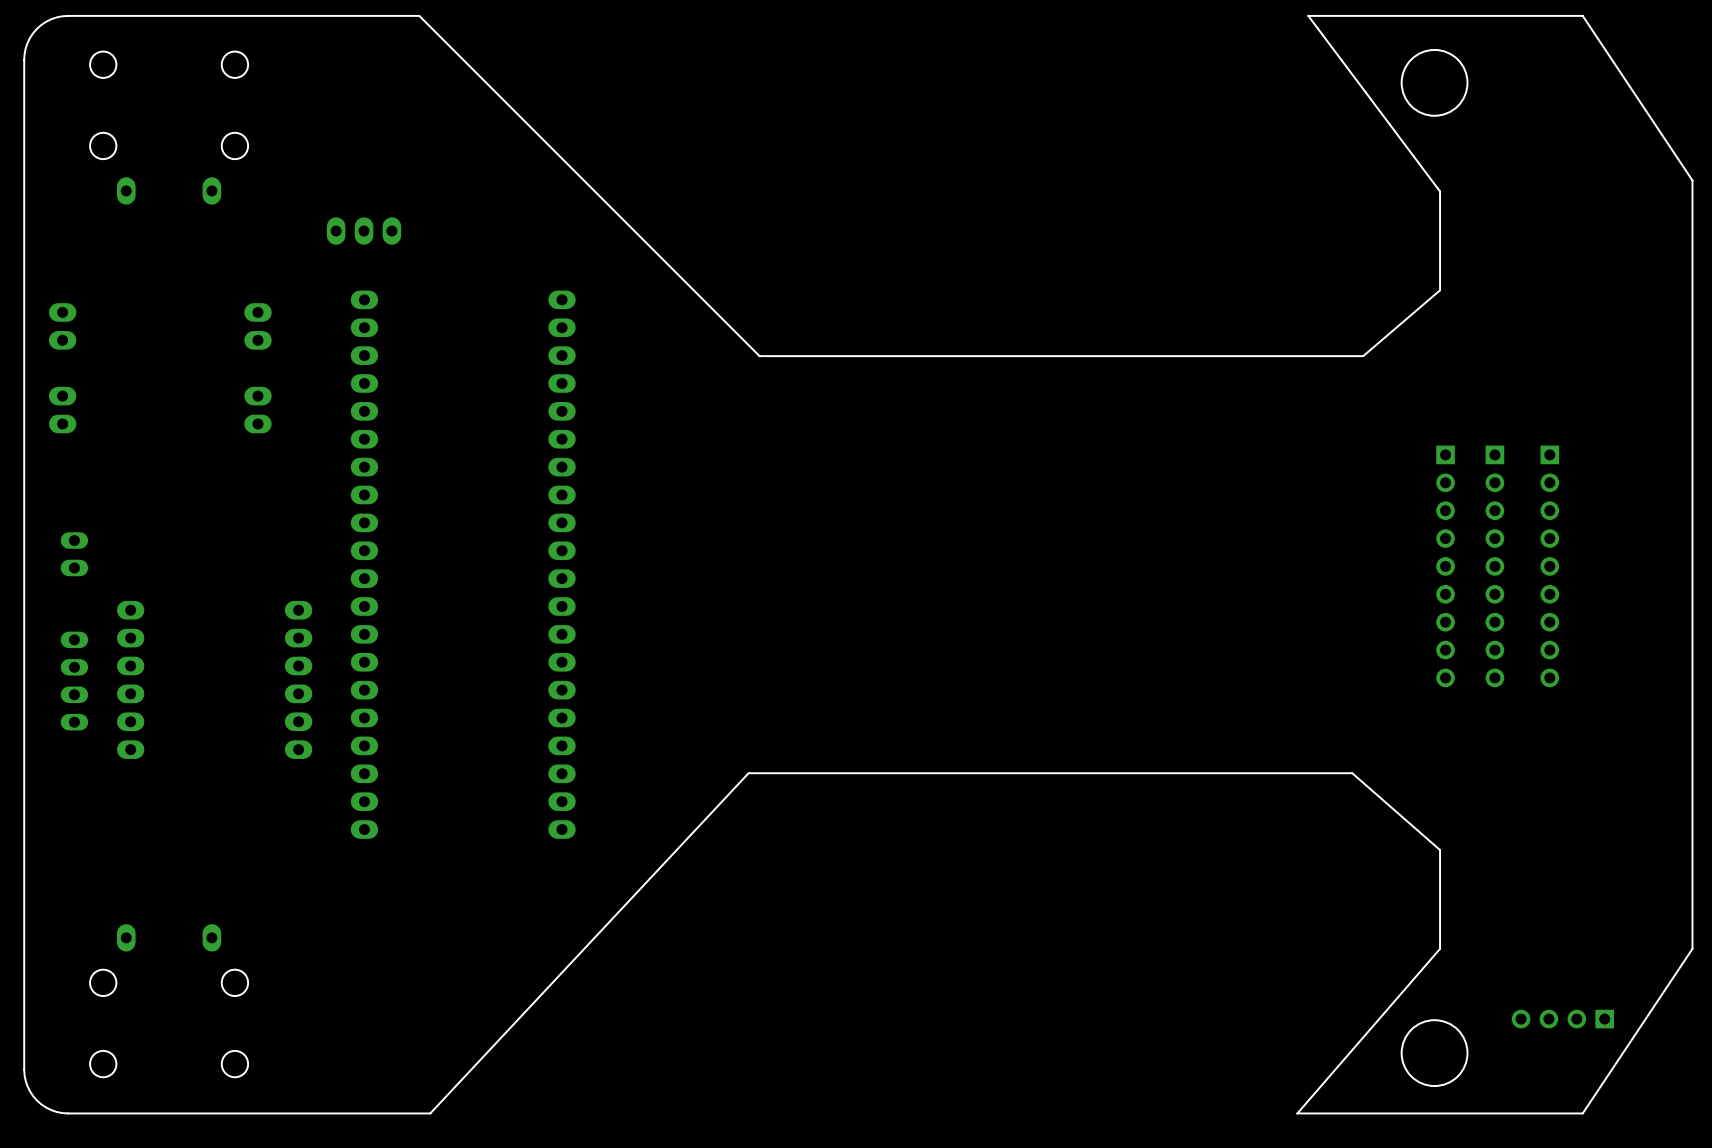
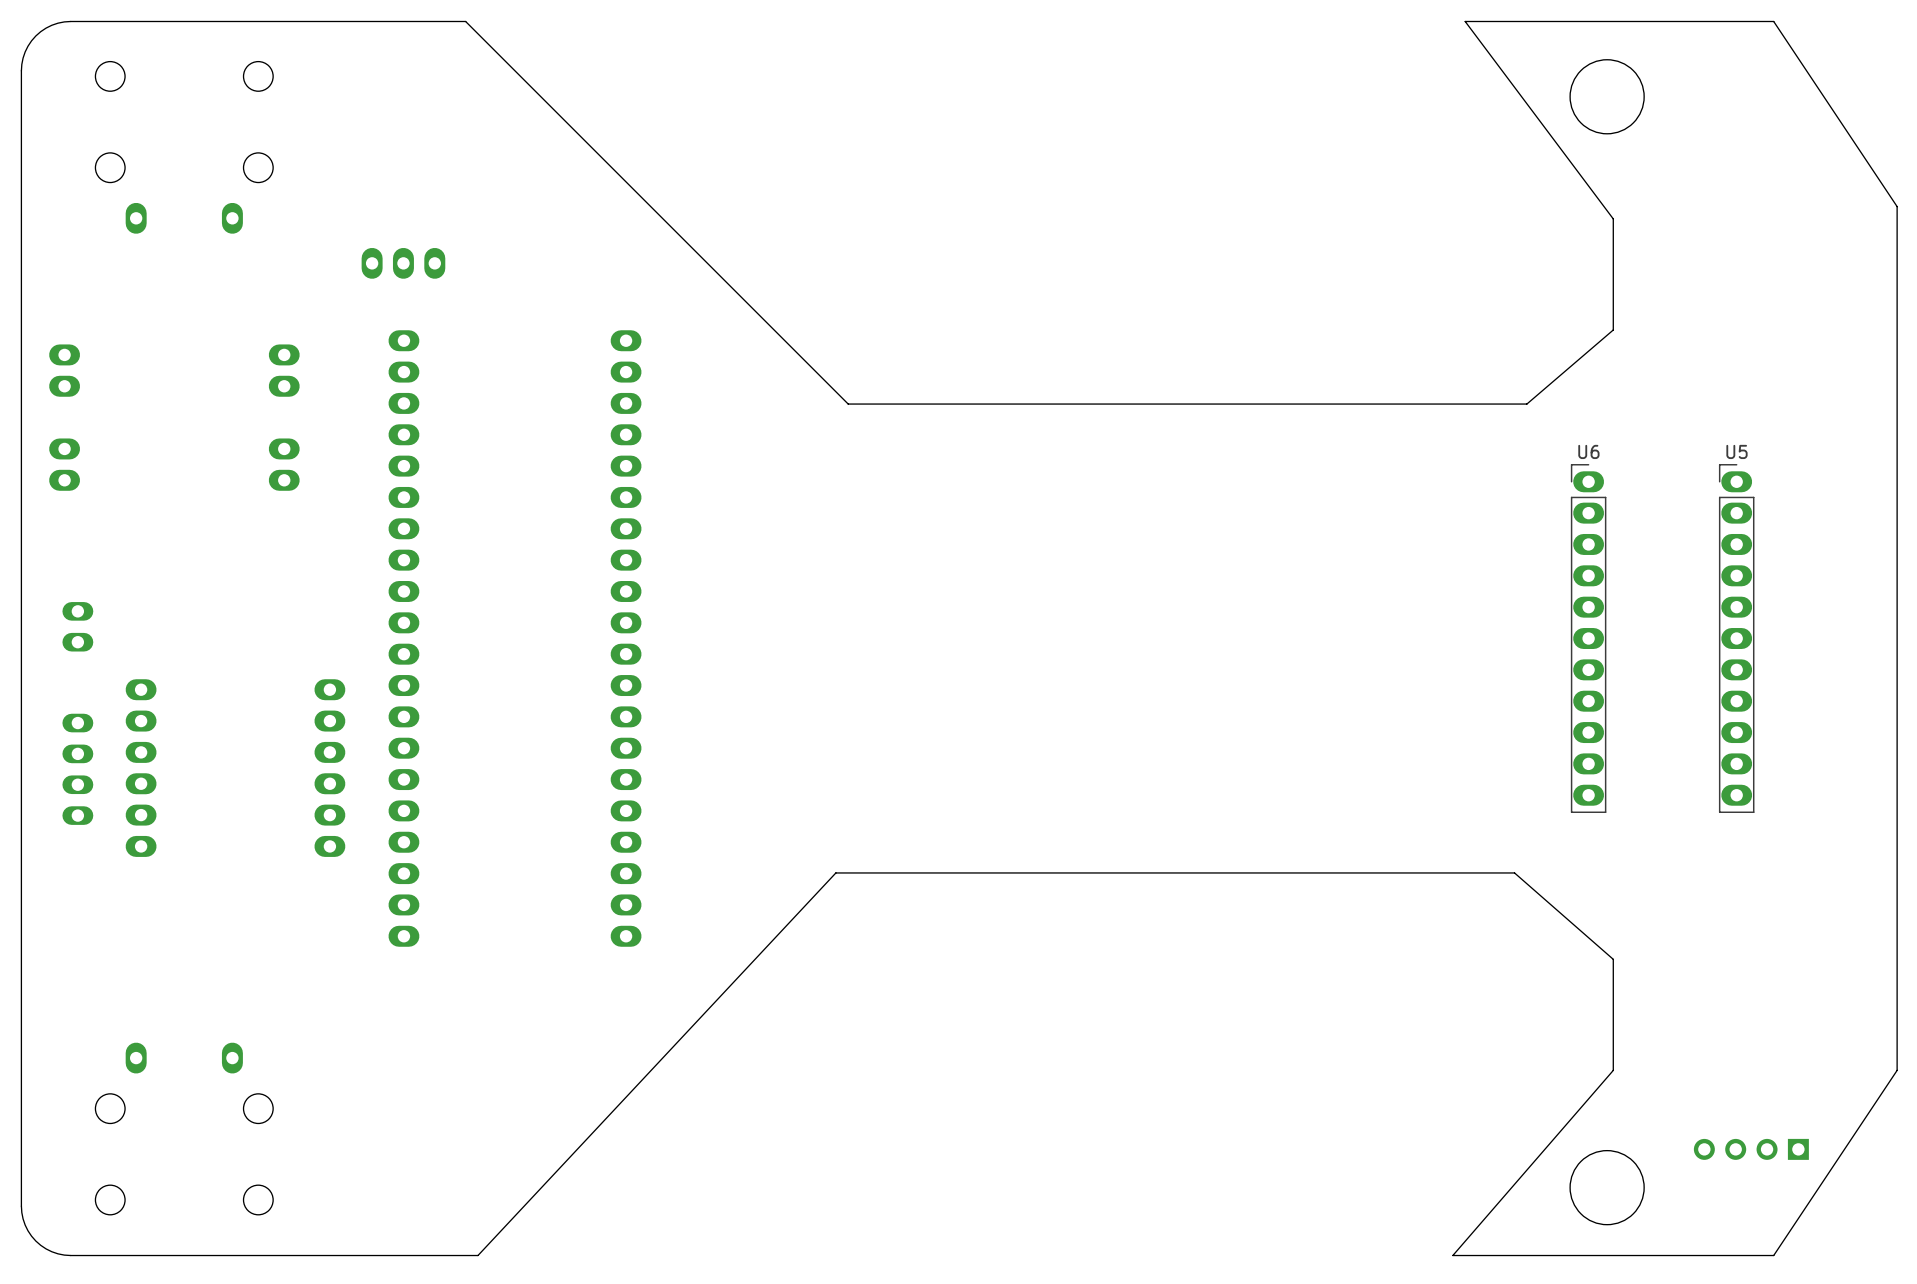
U6: none -> (1588, 638)
U5: none -> (1736, 638)
part: (1445, 566) -> none
part: (1494, 566) -> none
part: (1549, 566) -> none

